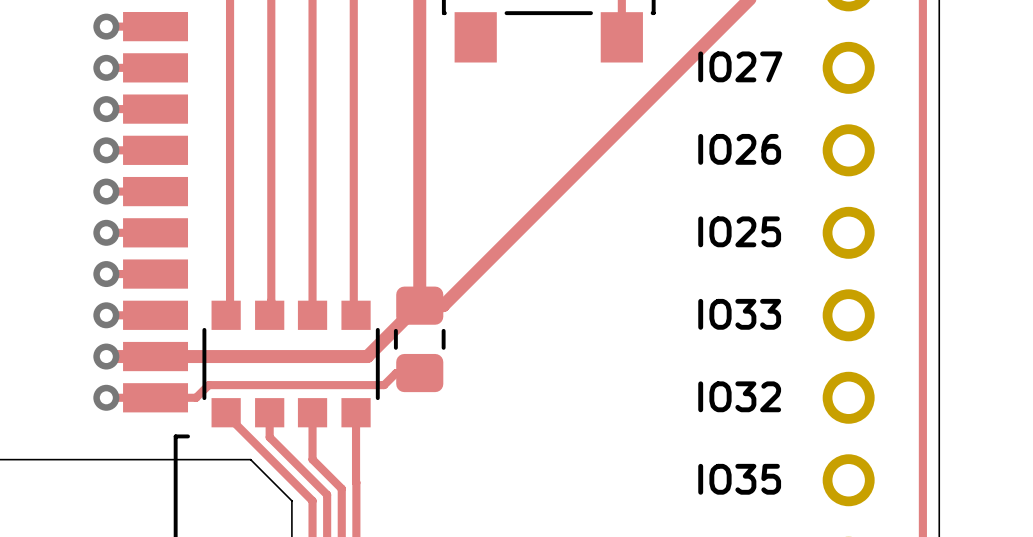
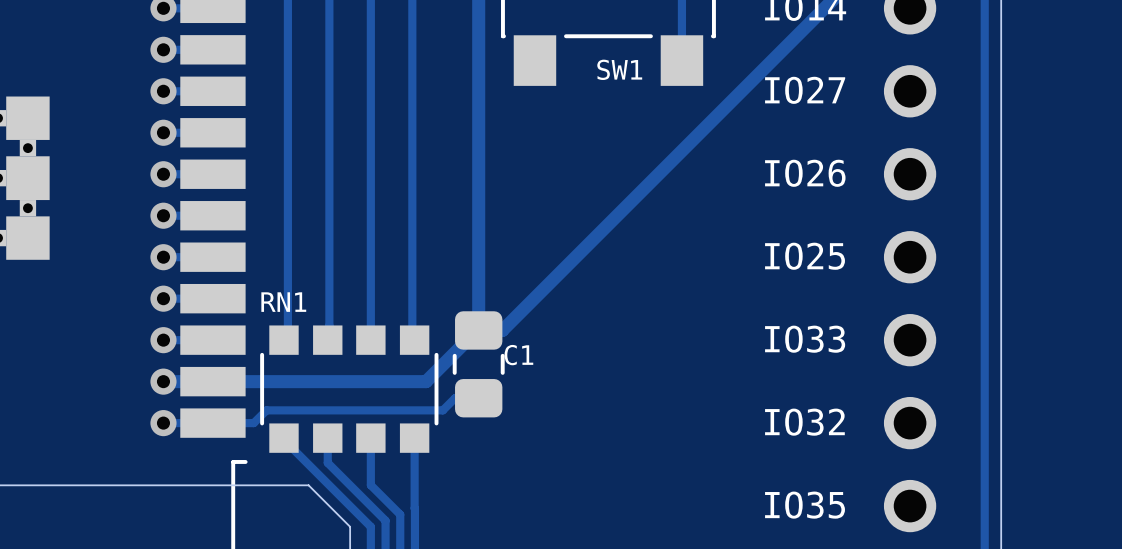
SW1 name: none -> SW1 (619, 69)
RN1 name: none -> RN1 (283, 302)
C1 name: none -> C1 (518, 355)

